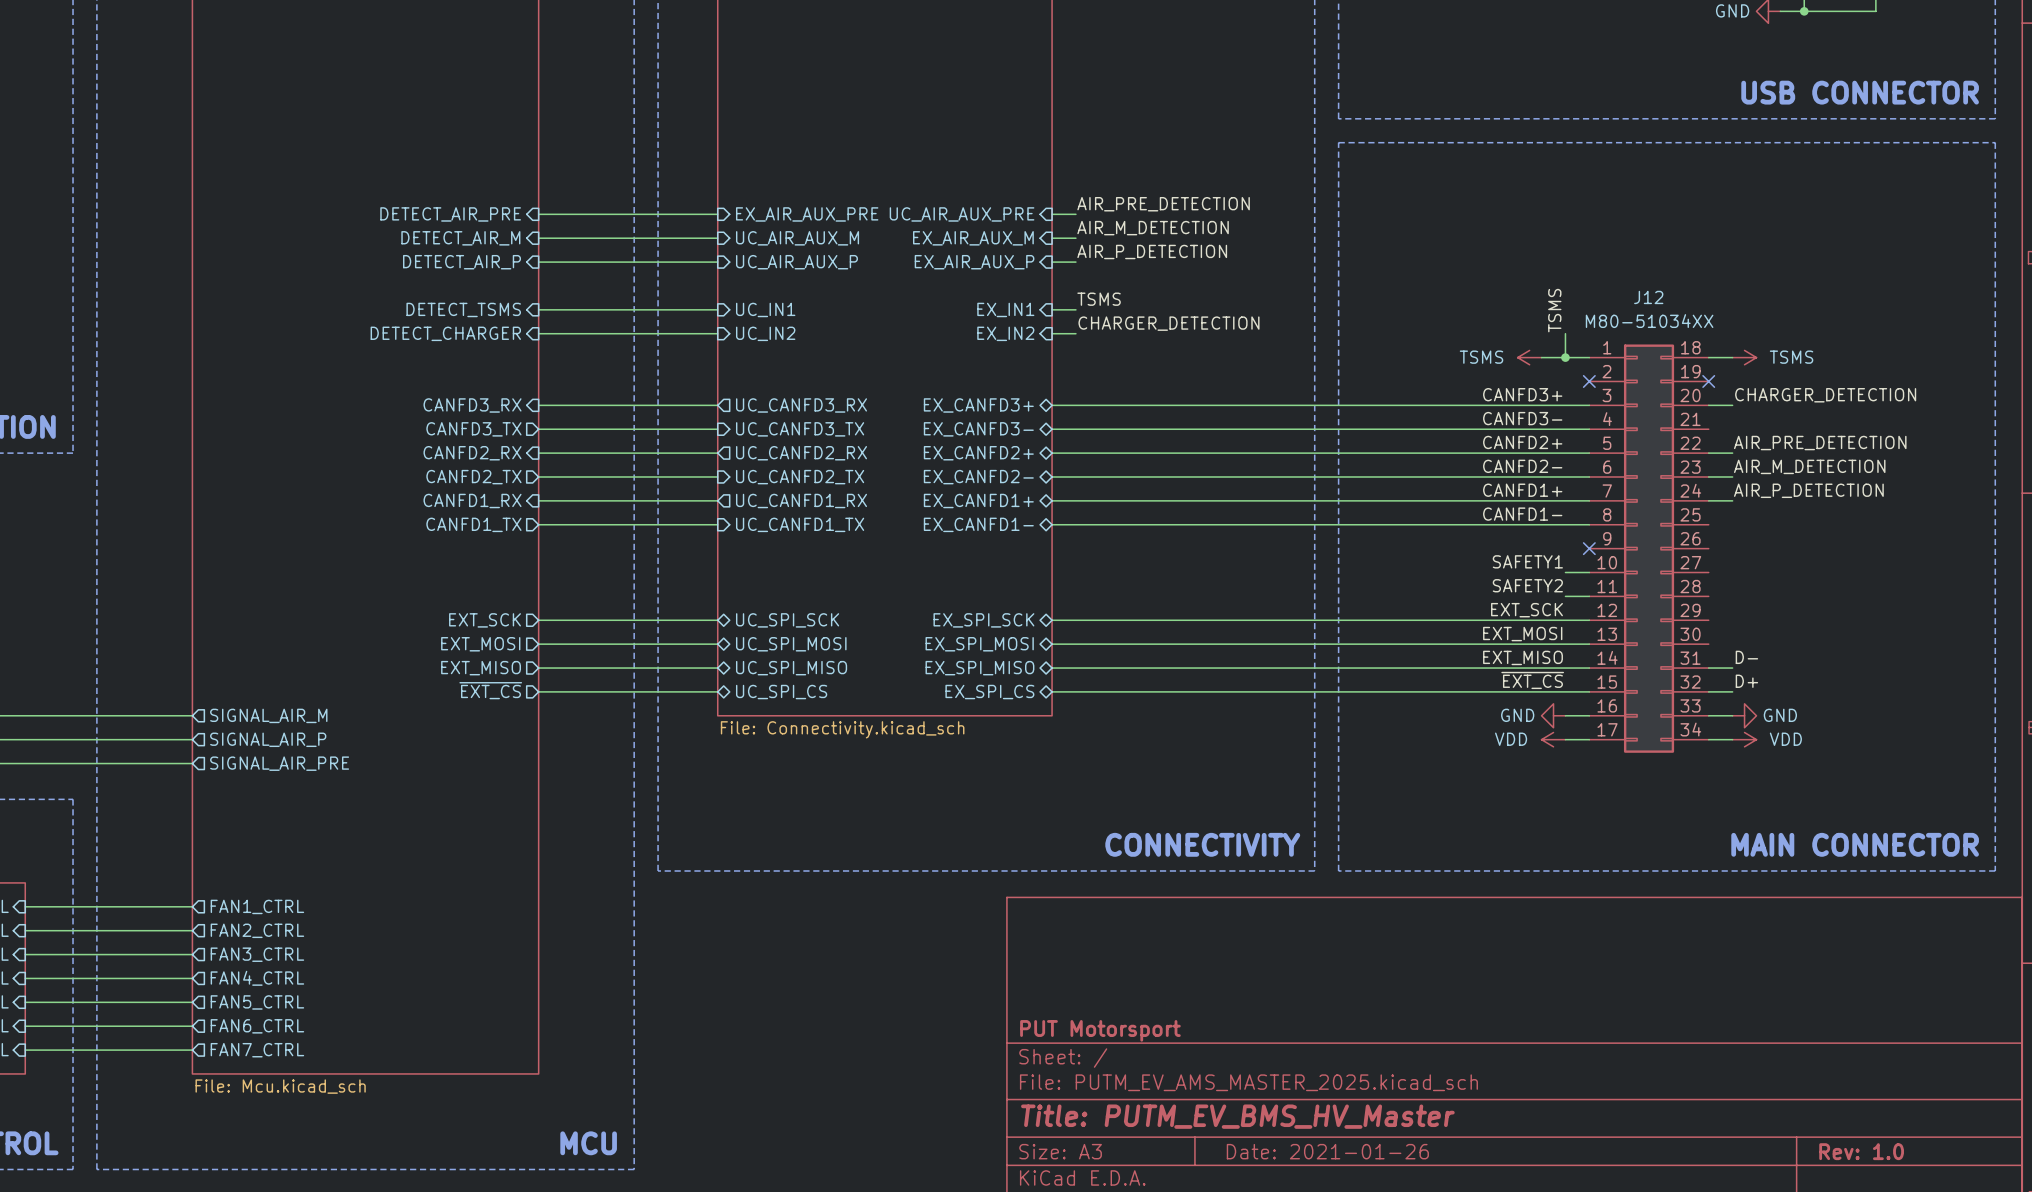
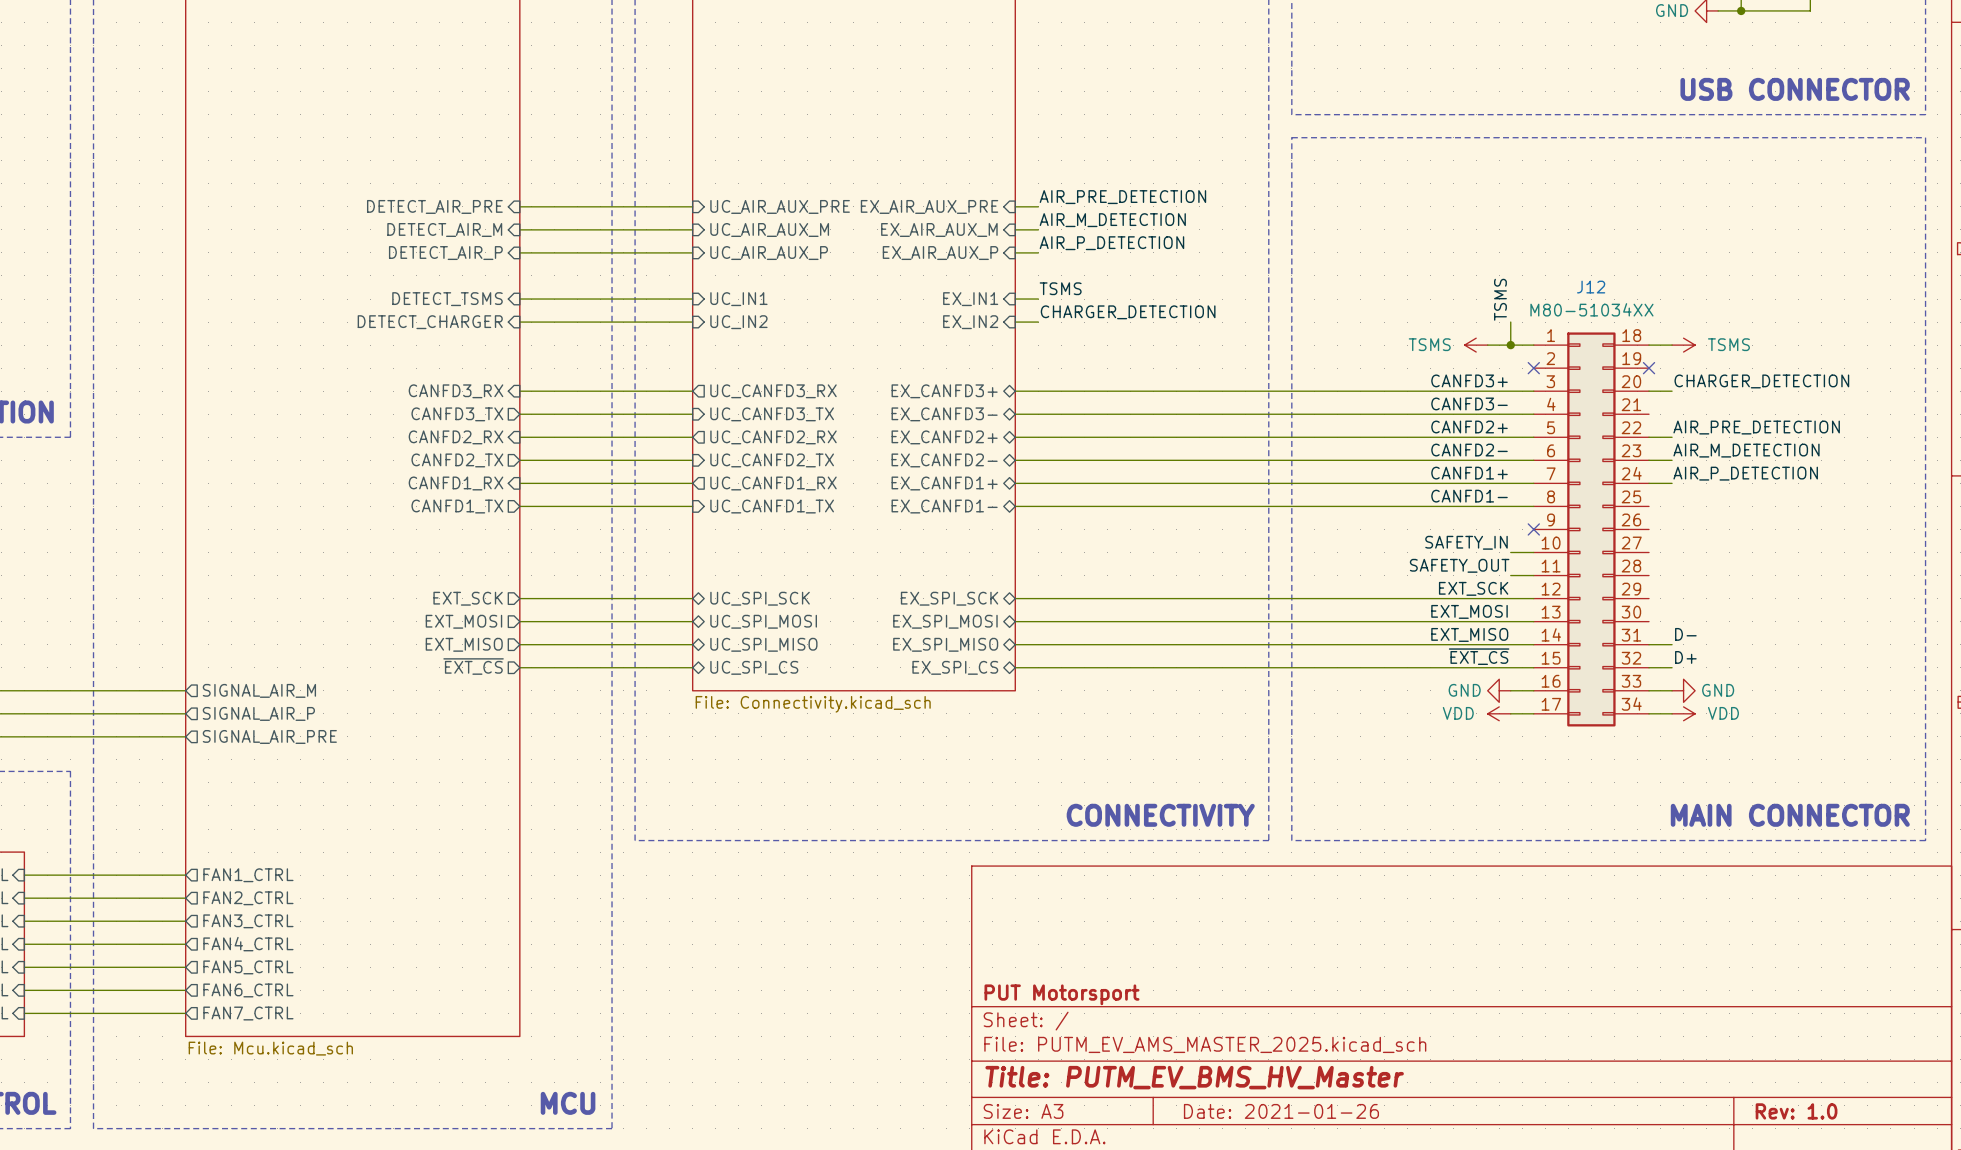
sheet pin: EX_AIR_AUX_PRE (807, 214) -> UC_AIR_AUX_PRE (780, 206)
sheet pin: UC_AIR_AUX_PRE (962, 214) -> EX_AIR_AUX_PRE (929, 206)
label: SAFETY1 (1527, 561) -> SAFETY_IN (1466, 542)
label: SAFETY2 (1527, 585) -> SAFETY_OUT (1459, 565)

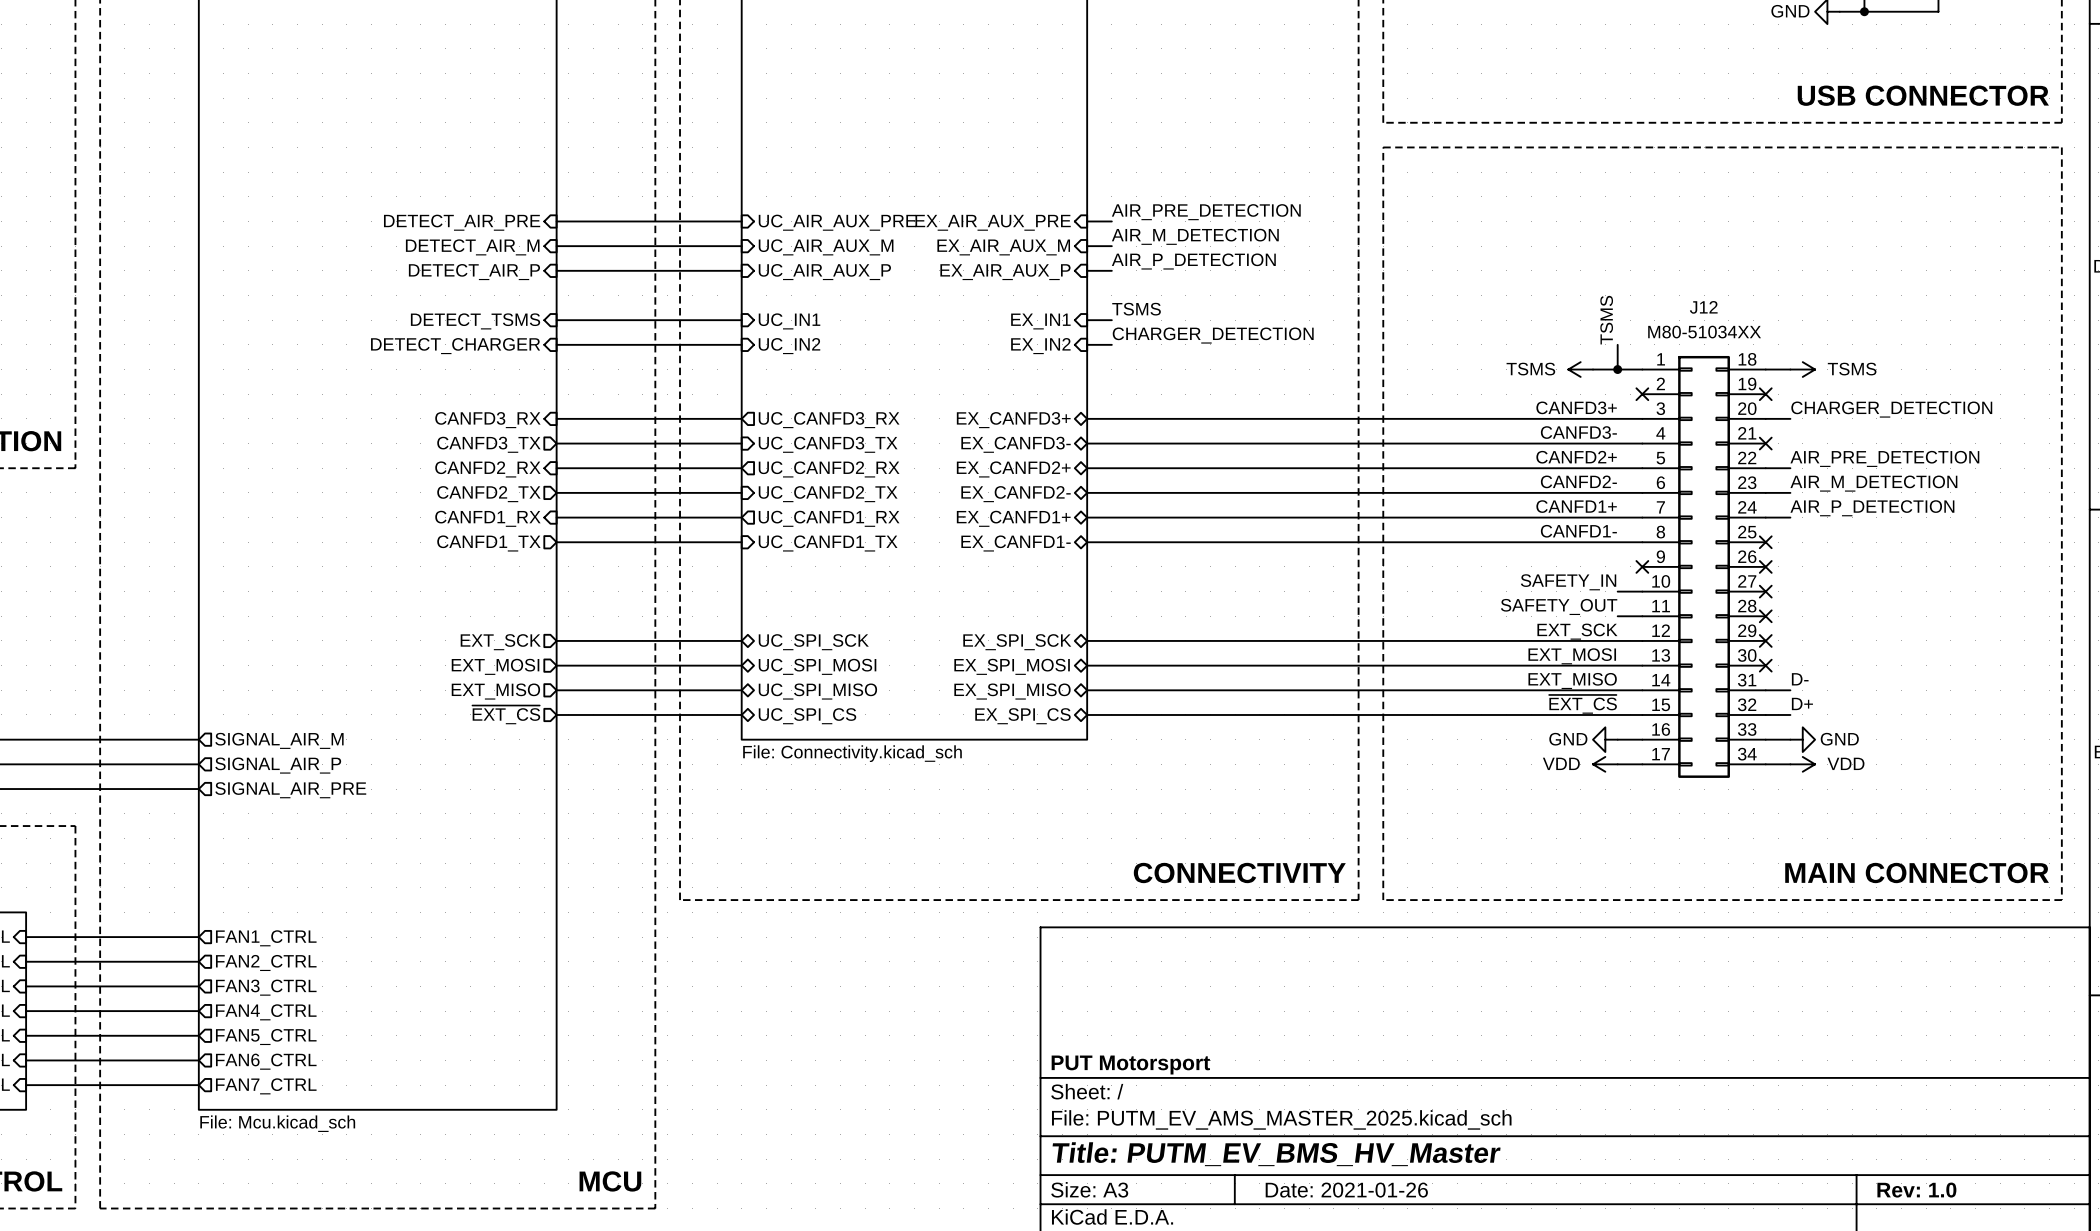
no-connect mark: none -> (1765, 443)
no-connect mark: none -> (1765, 542)
no-connect mark: none -> (1765, 566)
no-connect mark: none -> (1765, 591)
no-connect mark: none -> (1765, 616)
no-connect mark: none -> (1765, 640)
no-connect mark: none -> (1765, 665)

